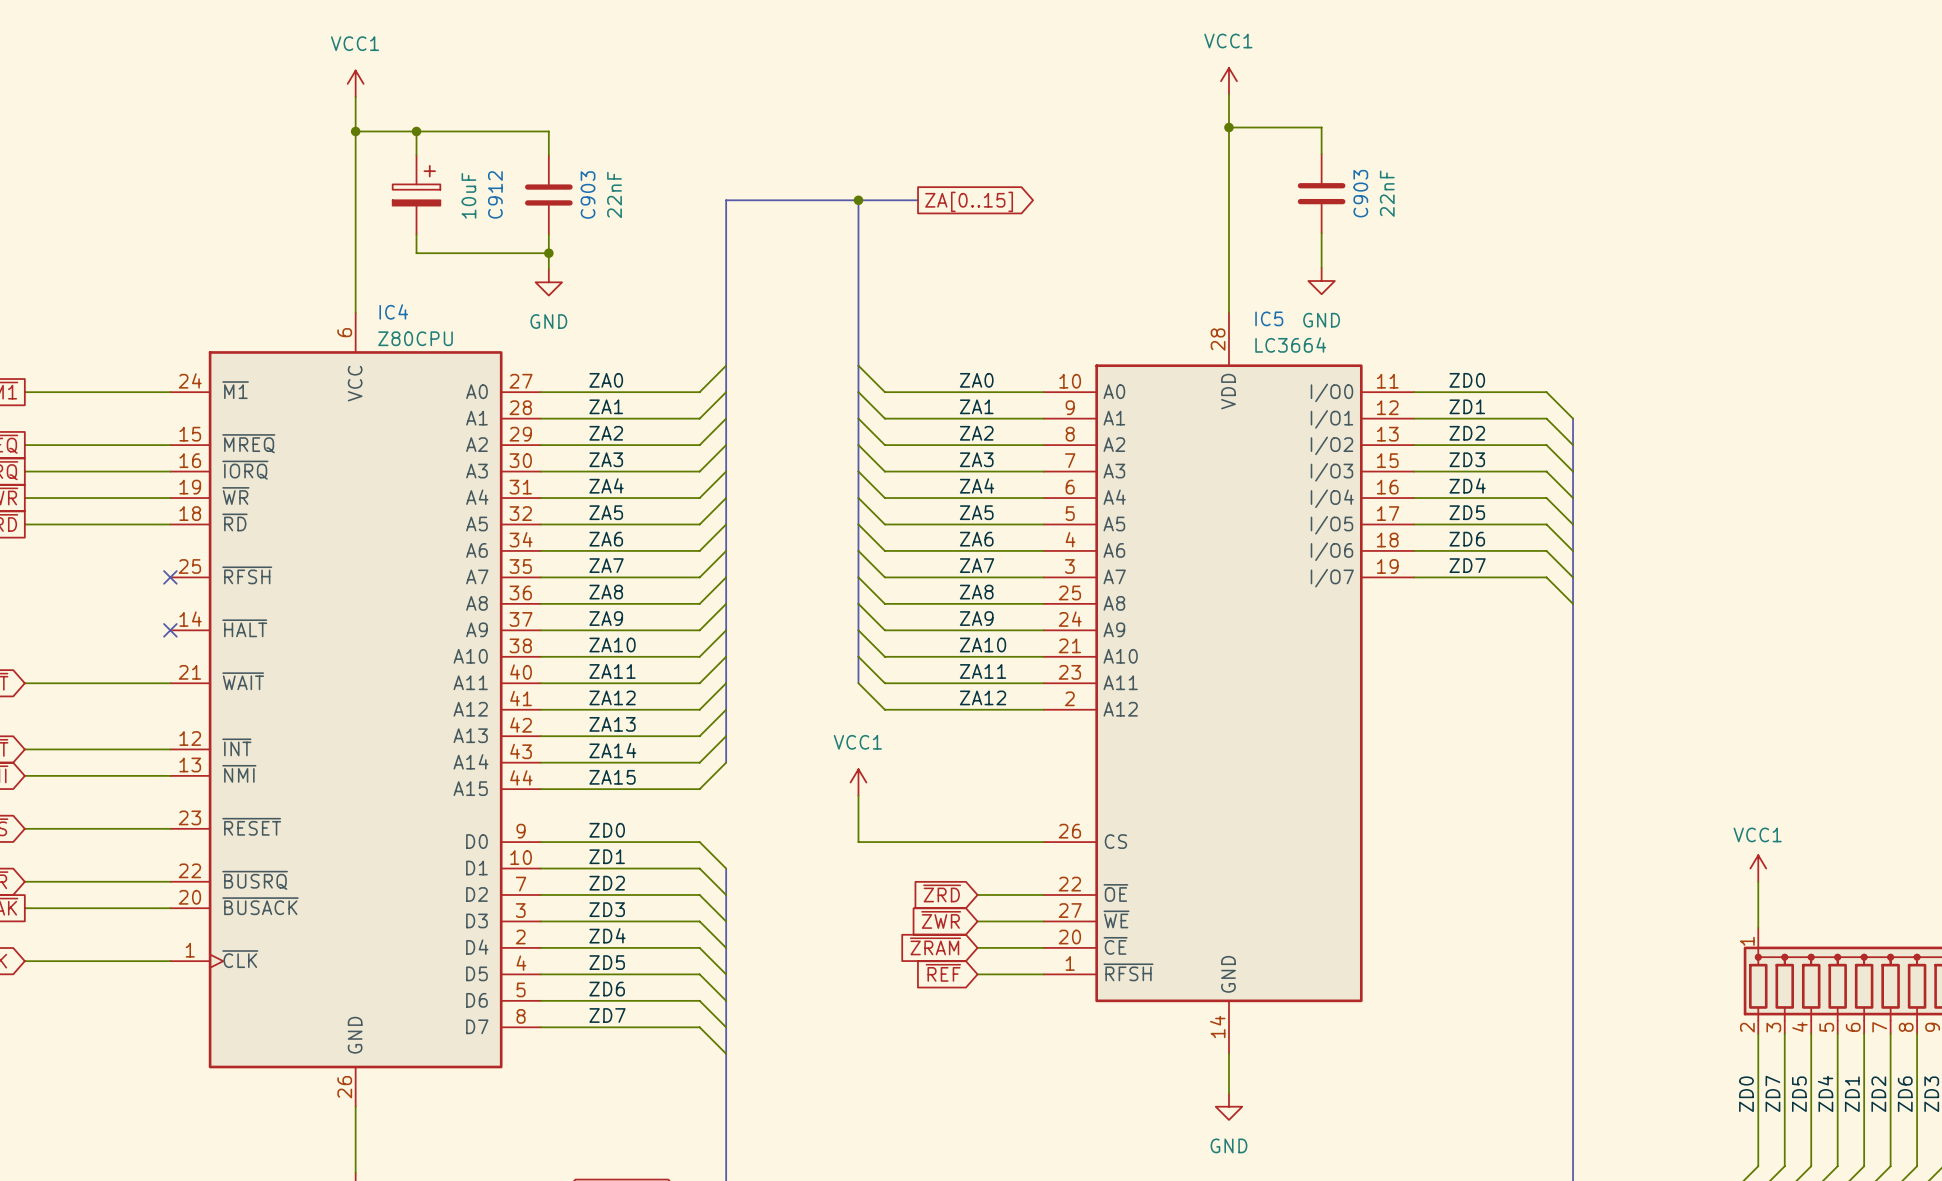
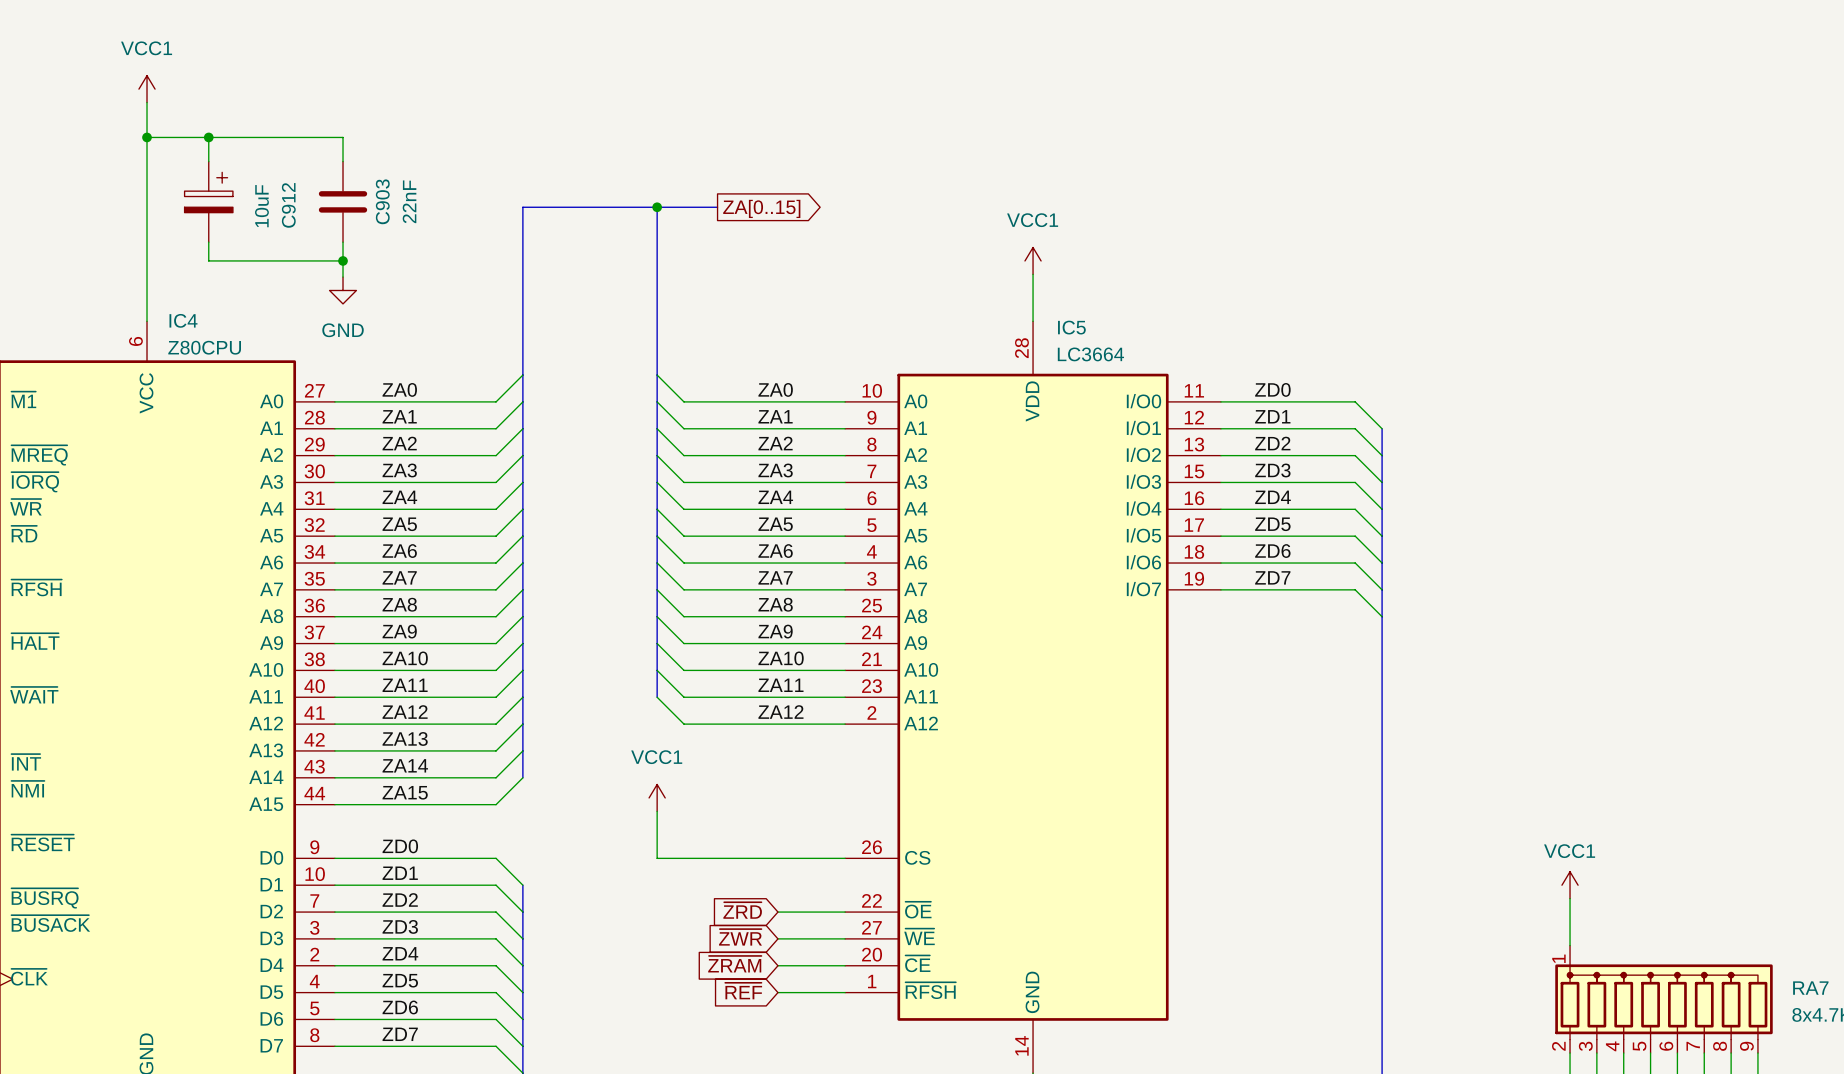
power symbol position: VCC1 (1228, 81) -> VCC1 (1033, 260)
wire: (1228, 94) (1228, 266) -> none
wire: (1228, 127) (1321, 127) (1321, 153) -> none
junction: (1228, 127) -> none
C903: 22nF (1321, 193) -> none
wire: (1321, 233) (1321, 267) -> none
power symbol: GND (1321, 281) -> none

